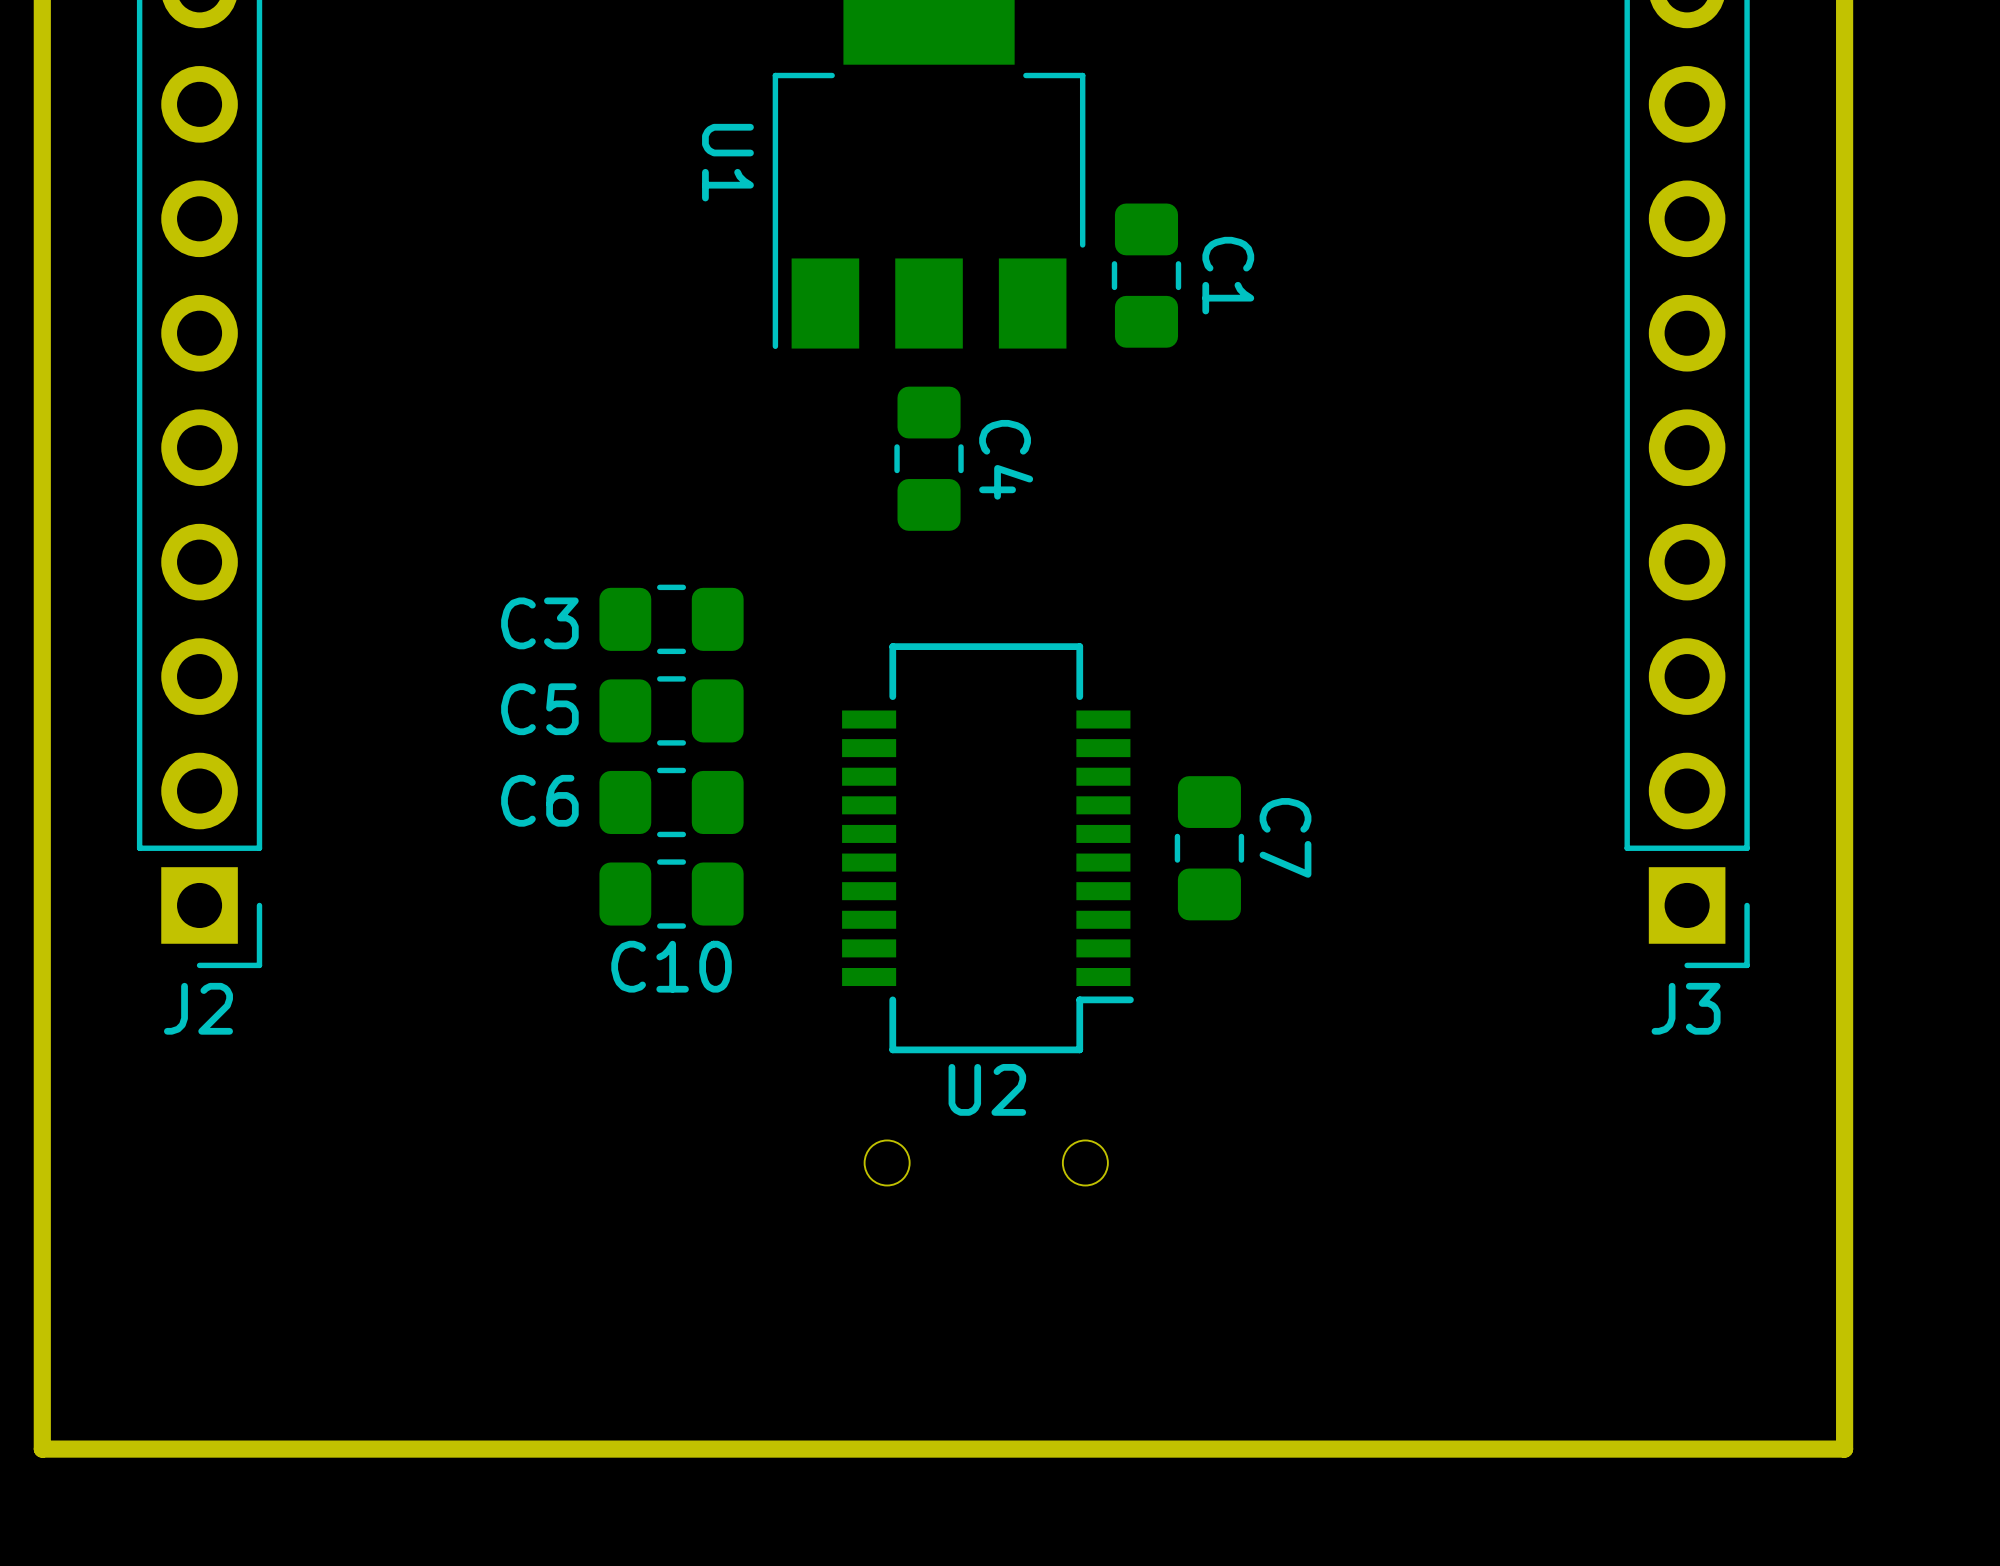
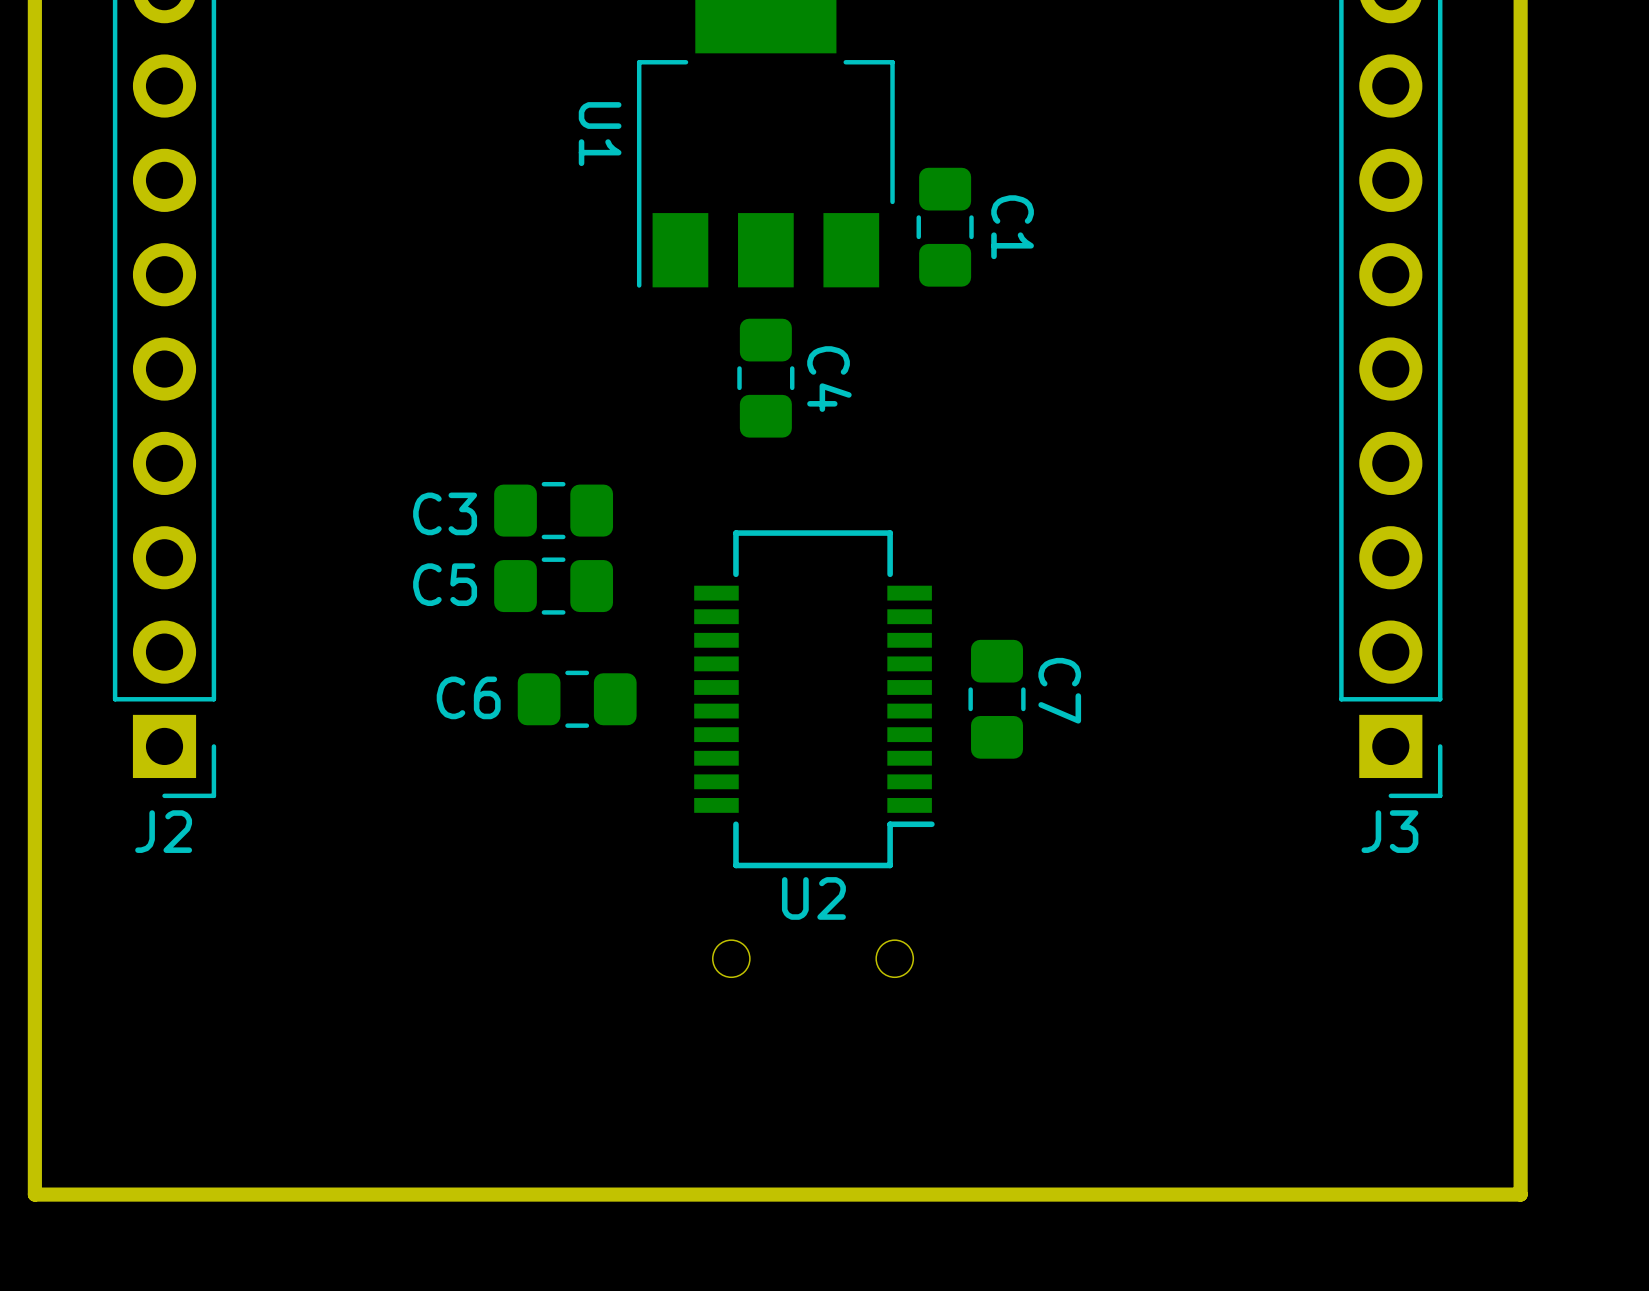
C6 position: (671, 802) -> (577, 699)
C10: (671, 894) -> none

